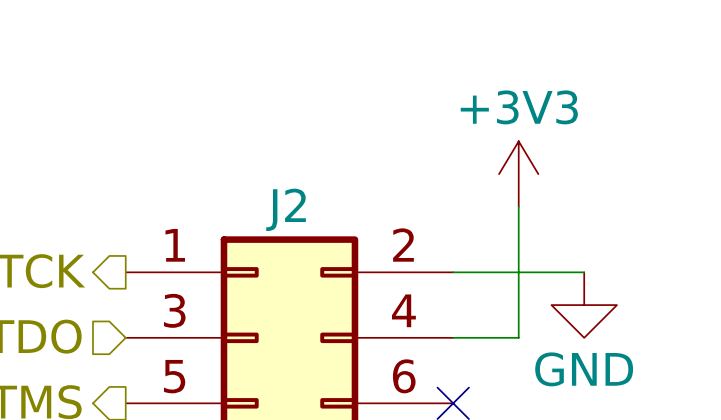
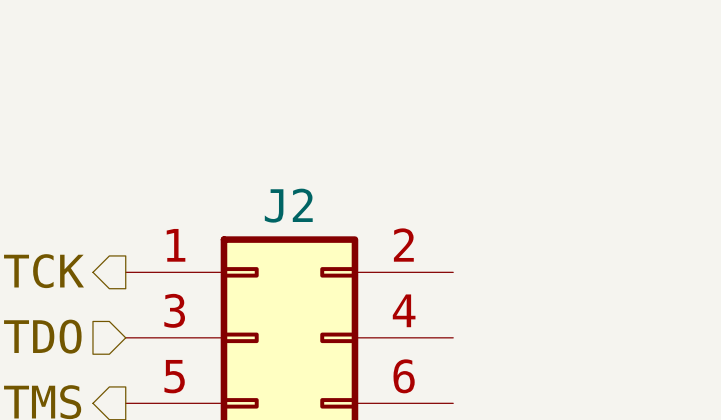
power symbol: +3V3 (518, 174) -> none
wire: (518, 206) (518, 337) (453, 337) -> none
wire: (453, 272) (584, 272) -> none
power symbol: GND (584, 305) -> none
no-connect mark: (453, 403) -> none

